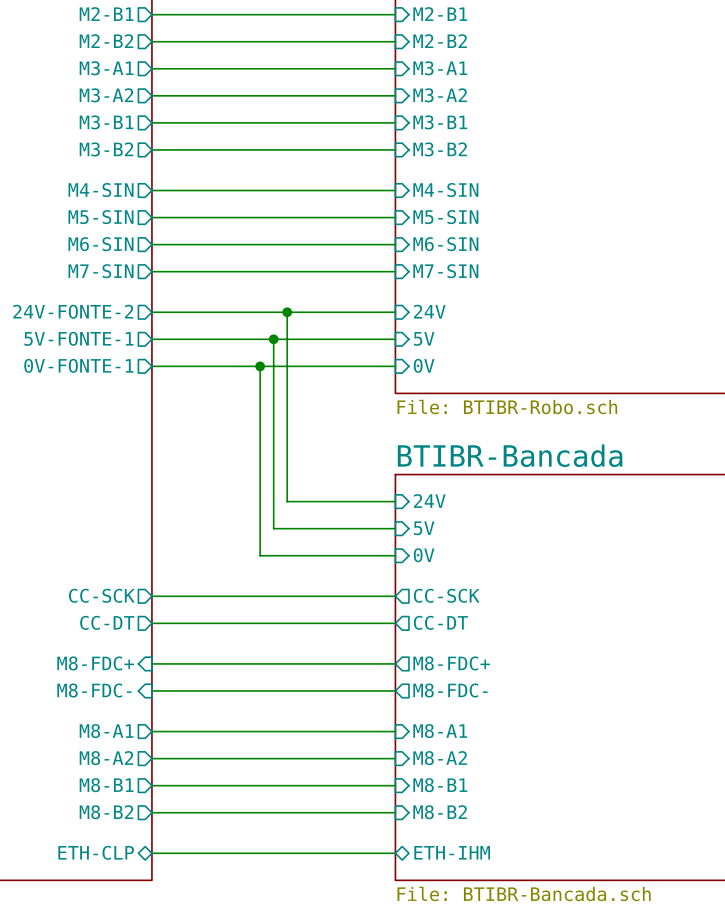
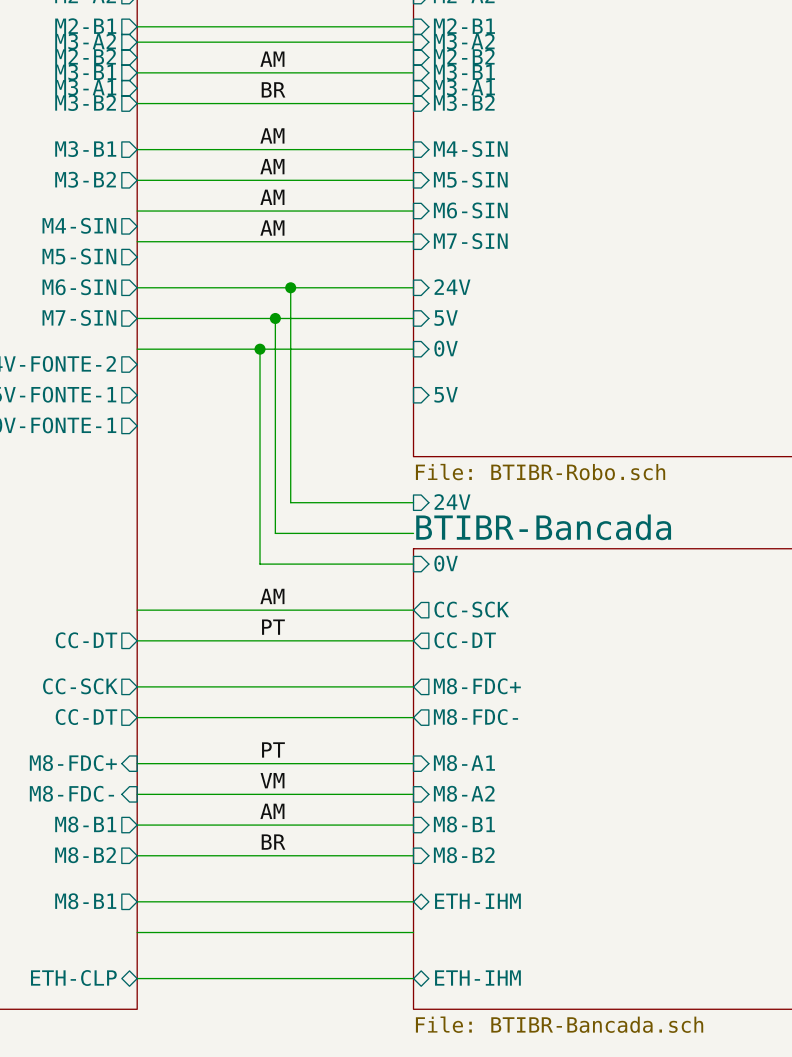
wire: (151, 41) (395, 41) -> (137, 42) (413, 42)
label: none -> AM (272, 59)
sheet pin: none -> M3-B1 (85, 72)
sheet pin: none -> M3-B1 (464, 72)
wire: (151, 68) (395, 68) -> (137, 72) (413, 72)
label: none -> BR (273, 89)
sheet pin: none -> M3-B2 (85, 103)
sheet pin: none -> M3-B2 (464, 103)
sheet pin position: M3-A2 (106, 95) -> M3-A2 (85, 41)
wire: (151, 95) (395, 95) -> (137, 103) (413, 103)
sheet pin position: M3-A2 (440, 95) -> M3-A2 (464, 41)
label: none -> AM (272, 135)
sheet pin: M3-B1 (440, 122) -> M4-SIN (470, 149)
label: none -> AM (272, 166)
sheet pin: M3-B2 (440, 149) -> M5-SIN (470, 179)
label: none -> AM (272, 197)
sheet pin: none -> M6-SIN (470, 210)
wire: (151, 190) (395, 190) -> (137, 211) (413, 211)
sheet pin: M4-SIN (445, 190) -> none
label: none -> AM (272, 228)
sheet pin: none -> M7-SIN (470, 241)
wire: (151, 217) (395, 217) -> (137, 241) (413, 241)
sheet pin: M5-SIN (445, 217) -> none
wire: none -> (290, 287) (290, 364)
junction: none -> (290, 287)
sheet pin: M6-SIN (445, 244) -> 24V (452, 287)
wire: none -> (275, 318) (275, 395)
junction: none -> (275, 318)
sheet pin: M7-SIN (445, 271) -> 5V (446, 318)
wire: none -> (260, 349) (260, 425)
junction: none -> (260, 349)
sheet pin: none -> 0V (446, 348)
sheet pin: 24V (429, 311) -> none
wire: (151, 312) (395, 312) -> (137, 349) (413, 349)
junction: (287, 312) -> none
wire: (151, 339) (395, 339) -> none
junction: (273, 339) -> none
sheet pin: 0V (424, 365) -> none
wire: (151, 366) (395, 366) -> none
junction: (260, 366) -> none
wire: (287, 433) (287, 501) (395, 501) -> (290, 502) (413, 502)
sheet pin: none -> 24V (452, 501)
wire: (273, 461) (273, 528) -> (275, 533) (413, 533)
sheet pin: none -> 0V (446, 563)
wire: (260, 488) (260, 555) -> (137, 640) (260, 640)
wire: none -> (260, 564) (413, 564)
sheet pin: 24V (429, 500) -> none
label: none -> AM (272, 596)
wire: none -> (137, 610) (275, 610)
sheet pin shape: input (424, 528) -> output (471, 609)
sheet pin: 5V (424, 528) -> CC-SCK (471, 609)
label: none -> PT (273, 627)
sheet pin: none -> CC-DT (86, 640)
sheet pin shape: input (424, 555) -> output (465, 640)
sheet pin: 0V (424, 555) -> CC-DT (465, 640)
sheet pin: CC-SCK (446, 595) -> M8-FDC+ (477, 686)
sheet pin: CC-DT (440, 622) -> M8-FDC- (475, 717)
label: none -> PT (273, 749)
sheet pin shape: output (451, 663) -> input (464, 763)
sheet pin: M8-FDC+ (451, 663) -> M8-A1 (464, 763)
label: none -> VM (272, 780)
sheet pin shape: output (450, 690) -> input (464, 793)
sheet pin: M8-FDC- (450, 690) -> M8-A2 (464, 793)
label: none -> AM (272, 811)
sheet pin: M8-A1 (106, 731) -> M8-B1 (85, 824)
wire: (151, 731) (395, 731) -> (137, 825) (413, 825)
sheet pin: M8-A1 (440, 731) -> M8-B1 (464, 824)
label: none -> BR (273, 842)
sheet pin: M8-A2 (106, 758) -> none
wire: (151, 758) (395, 758) -> (137, 855) (413, 855)
sheet pin: M8-A2 (440, 758) -> none
sheet pin shape: input (440, 785) -> bidirectional (477, 901)
sheet pin: M8-B1 (440, 785) -> ETH-IHM (477, 901)
sheet pin position: M8-B2 (106, 812) -> M8-B2 (85, 855)
sheet pin position: M8-B2 (440, 812) -> M8-B2 (464, 855)

